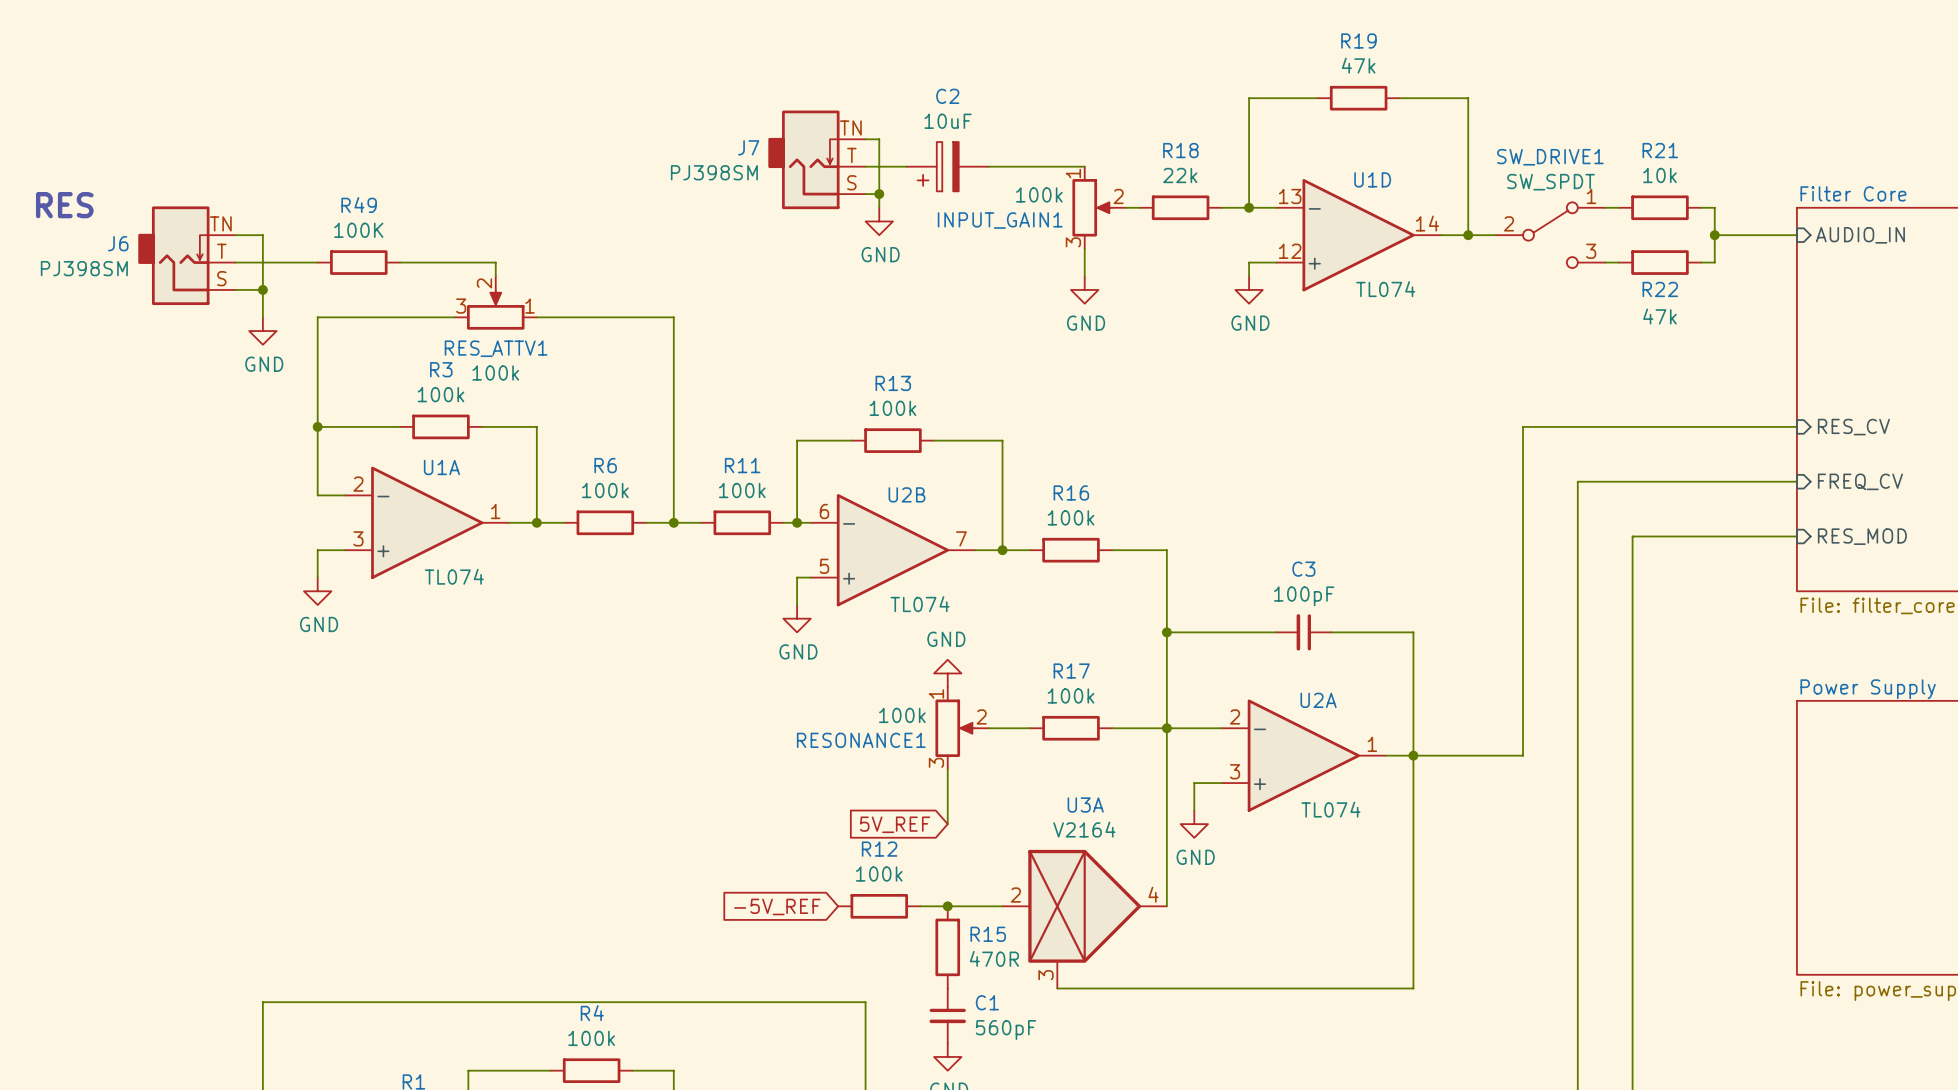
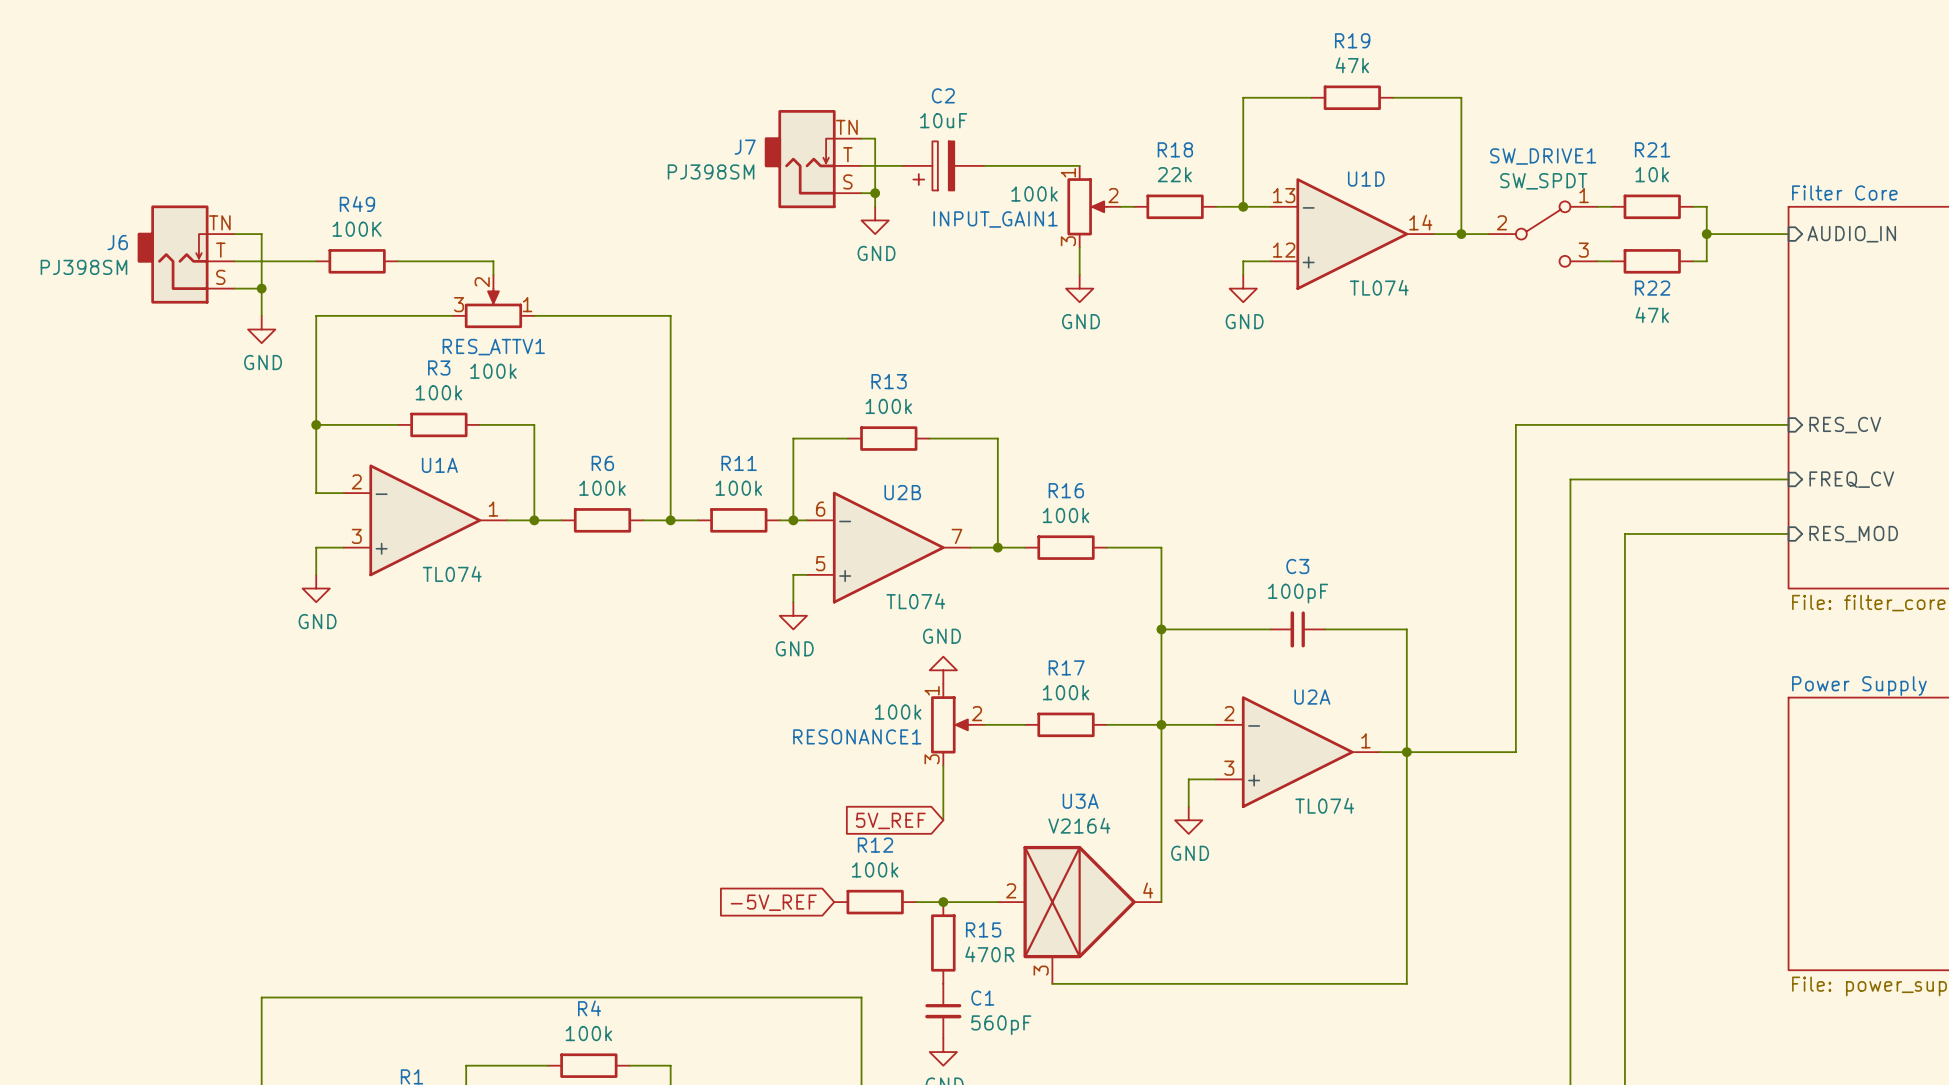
text: RES (64, 205) -> none

